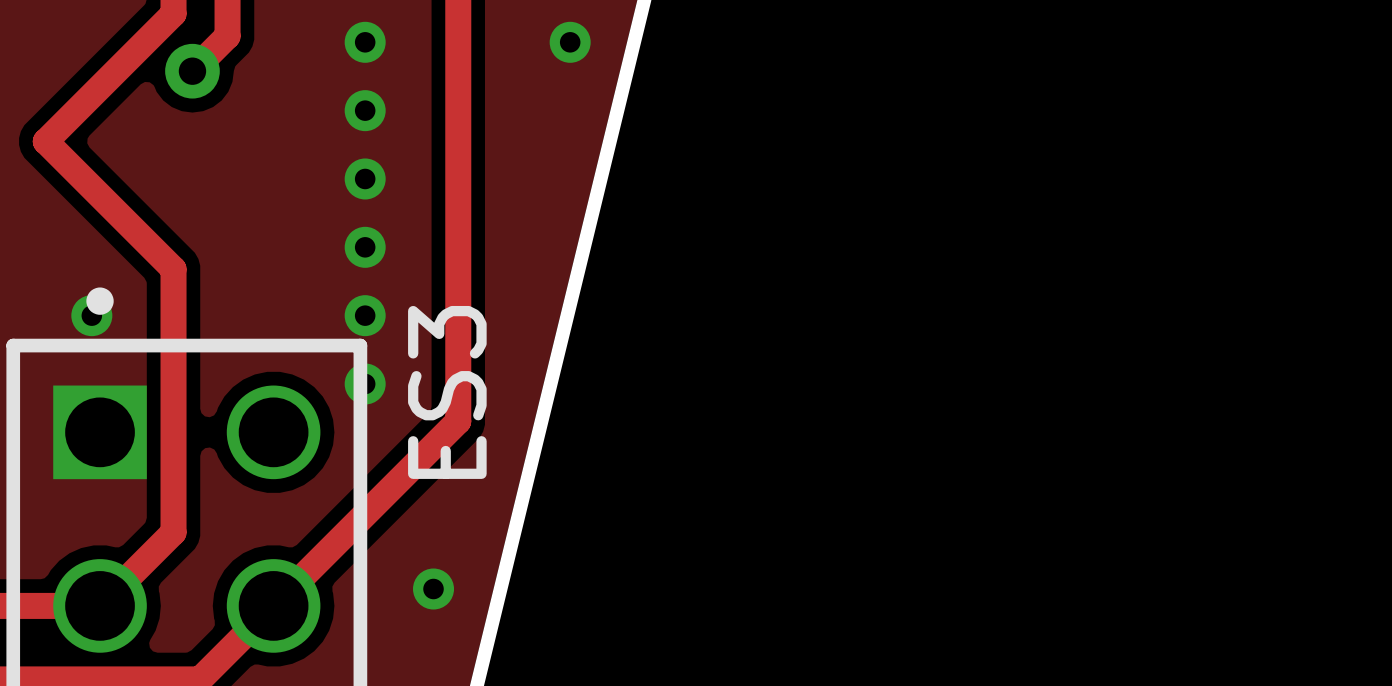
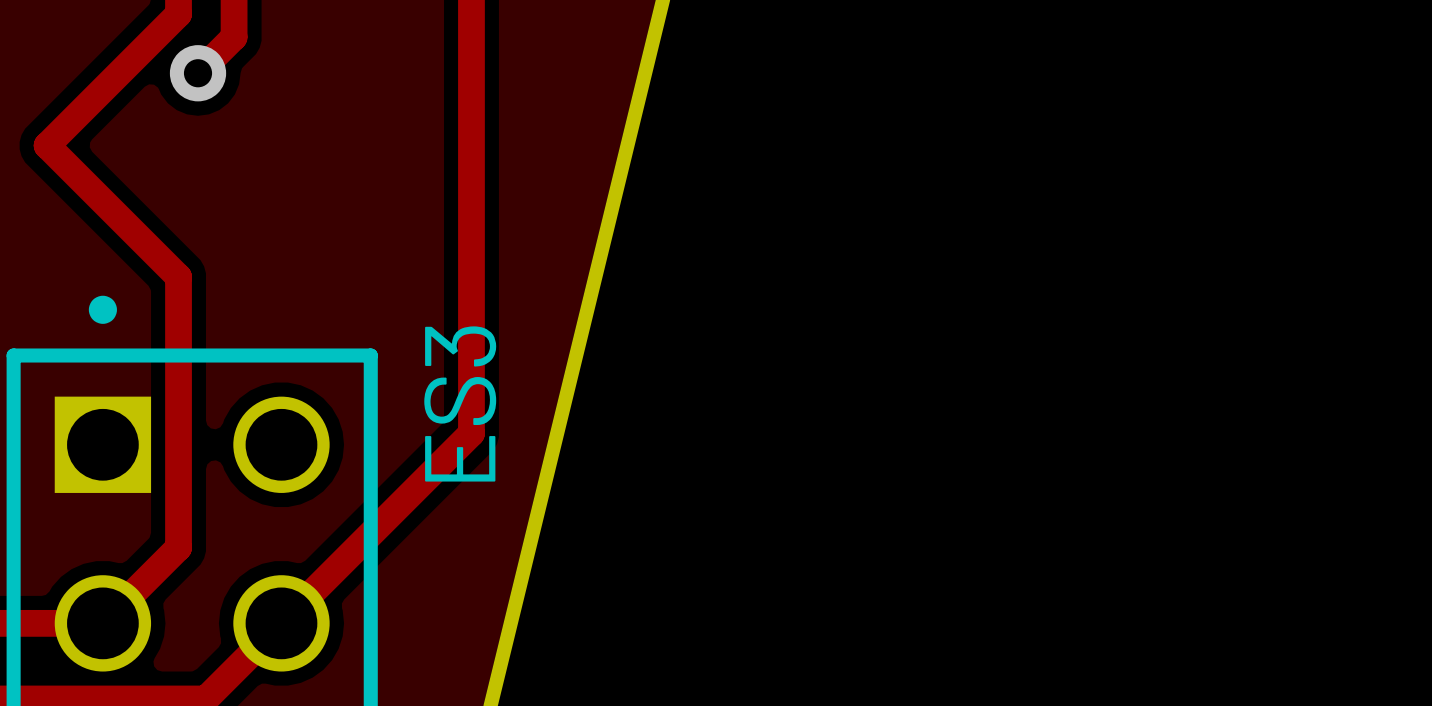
via: (365, 42) -> none
via: (570, 42) -> none
via: (365, 110) -> none
via: (365, 178) -> none
via: (365, 247) -> none
via: (91, 315) -> none
via: (365, 315) -> none
via: (365, 383) -> none
via: (433, 589) -> none

